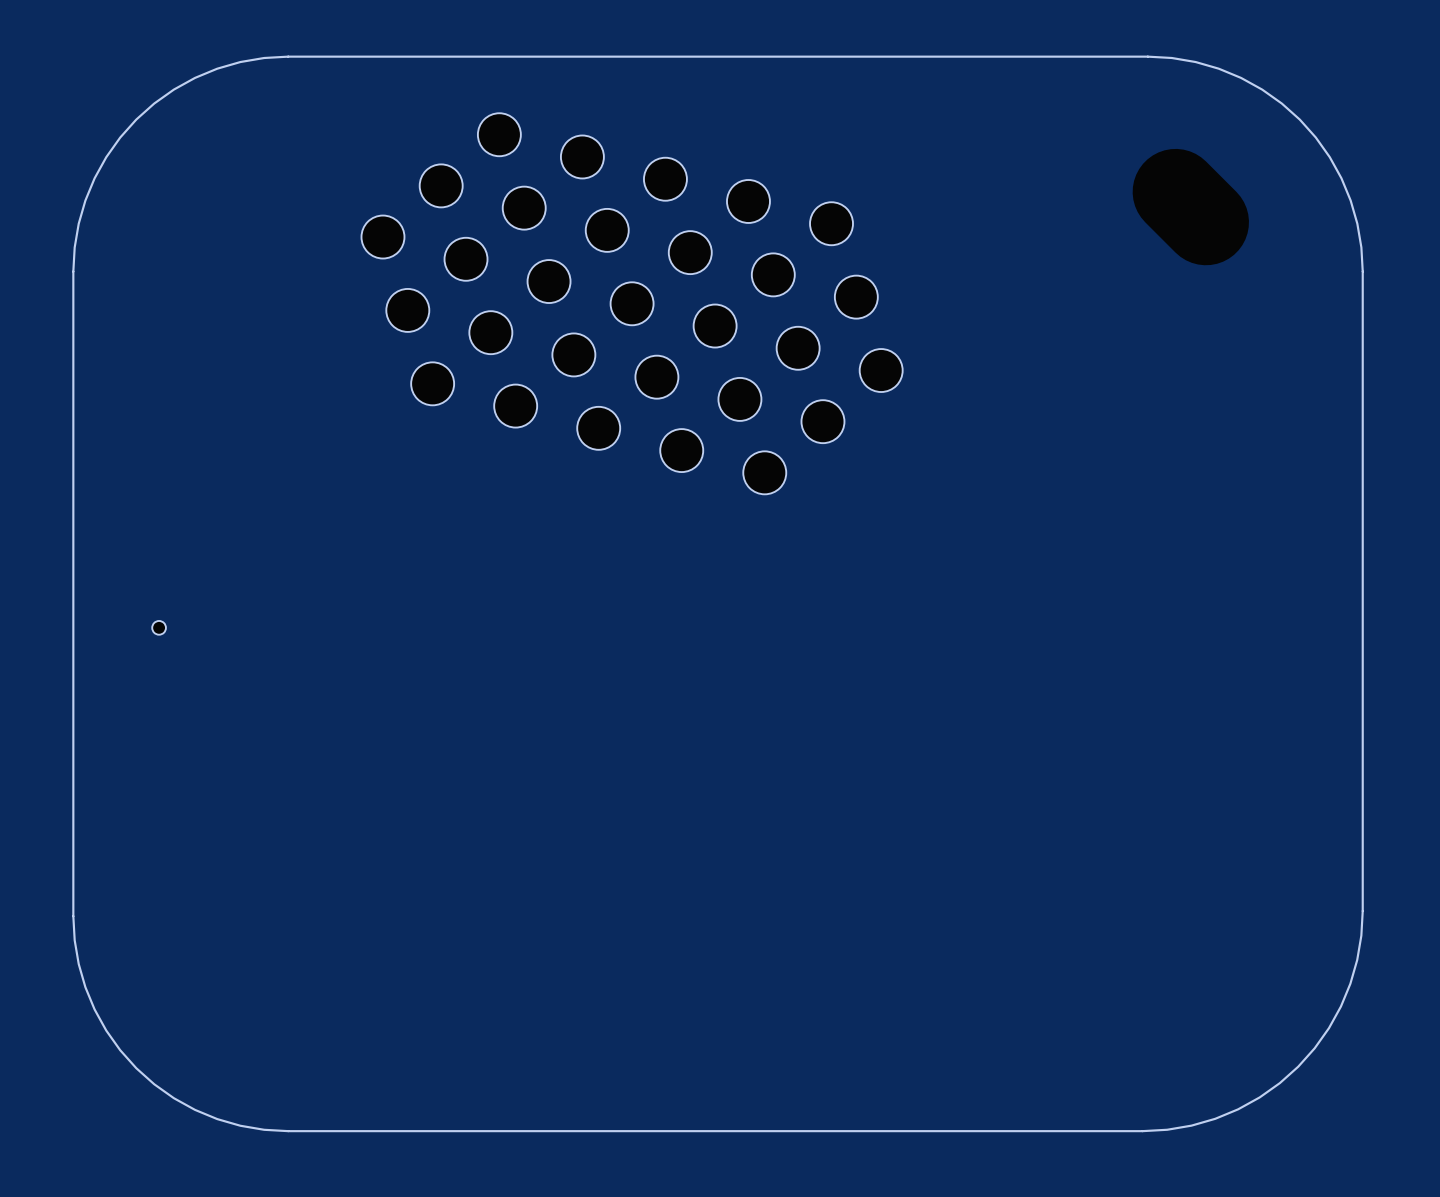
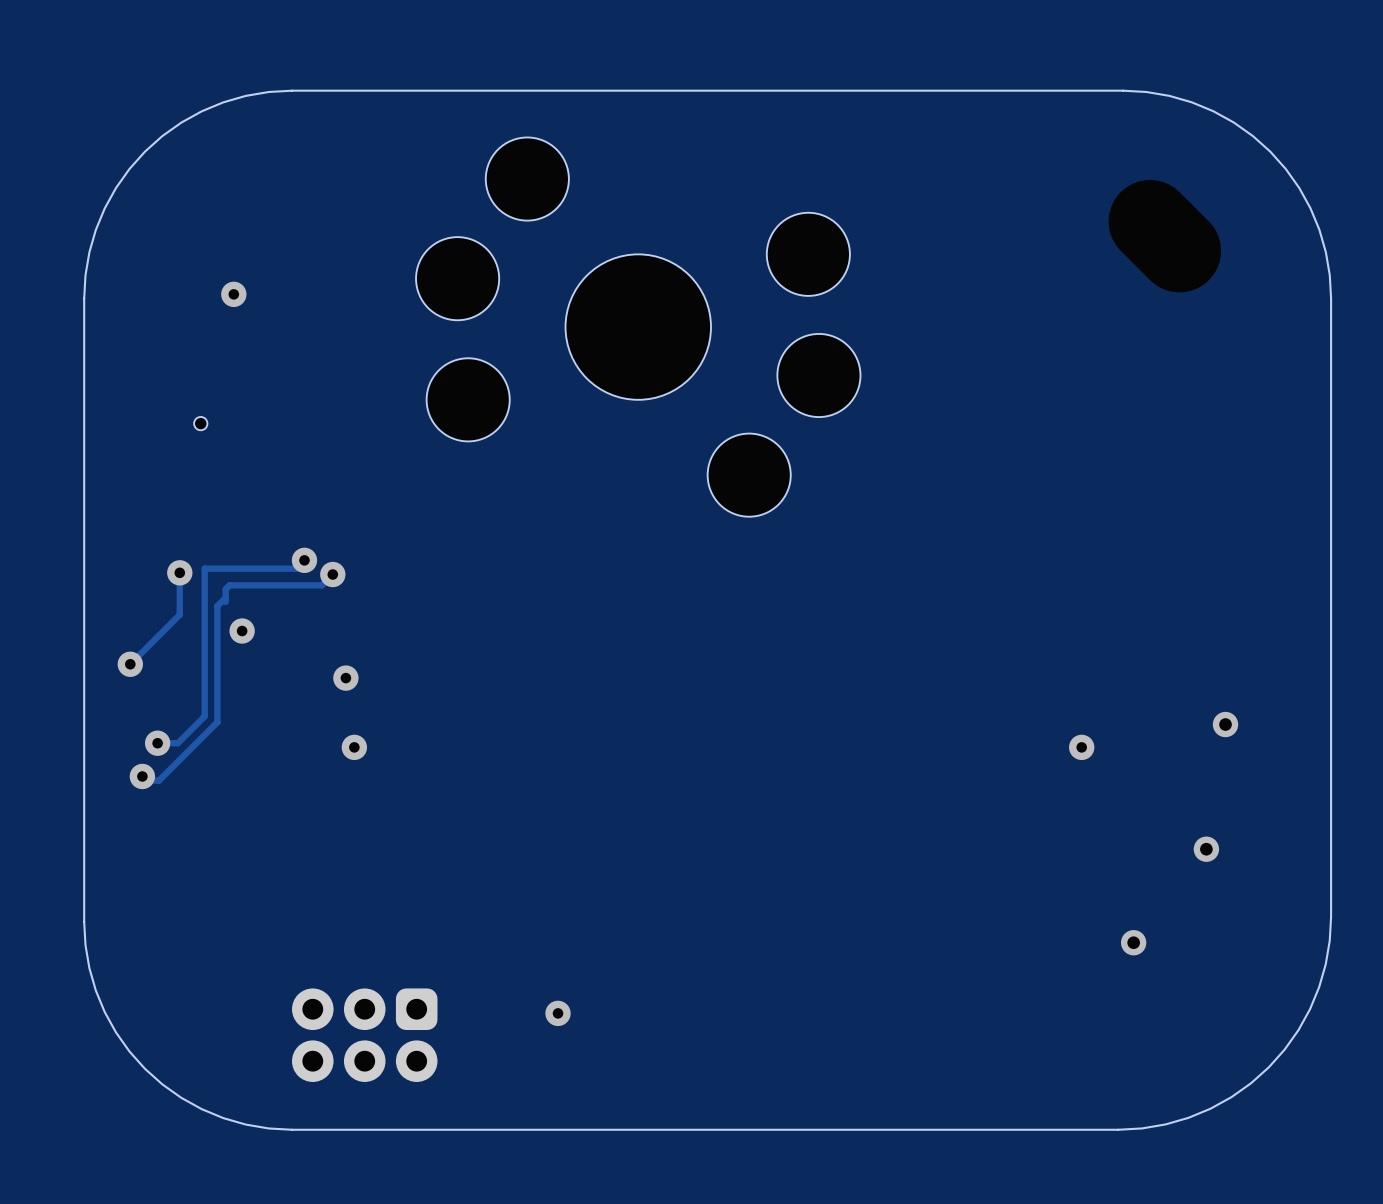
part footprint: [361, 113, 903, 495] -> [416, 137, 861, 517]
via: none -> (233, 294)
track: none -> (304, 560) (296, 568) (204, 568) (204, 716) (177, 743) (157, 743)
via: none -> (304, 560)
track: none -> (179, 572) (179, 614) (130, 664)
via: none -> (179, 572)
track: none -> (332, 574) (322, 585) (229, 585) (225, 589) (225, 601)
via: none -> (332, 574)
track: none -> (225, 597) (217, 606) (217, 722) (159, 780) (146, 780) (142, 776)
via: none -> (242, 631)
part position: (159, 627) -> (200, 423)
via: none -> (130, 664)
via: none -> (345, 678)
via: none -> (1225, 724)
via: none -> (157, 743)
via: none -> (354, 747)
via: none -> (1081, 747)
via: none -> (142, 776)
via: none -> (1206, 849)
via: none -> (1133, 942)
via: none -> (558, 1013)
part: none -> (364, 1035)

